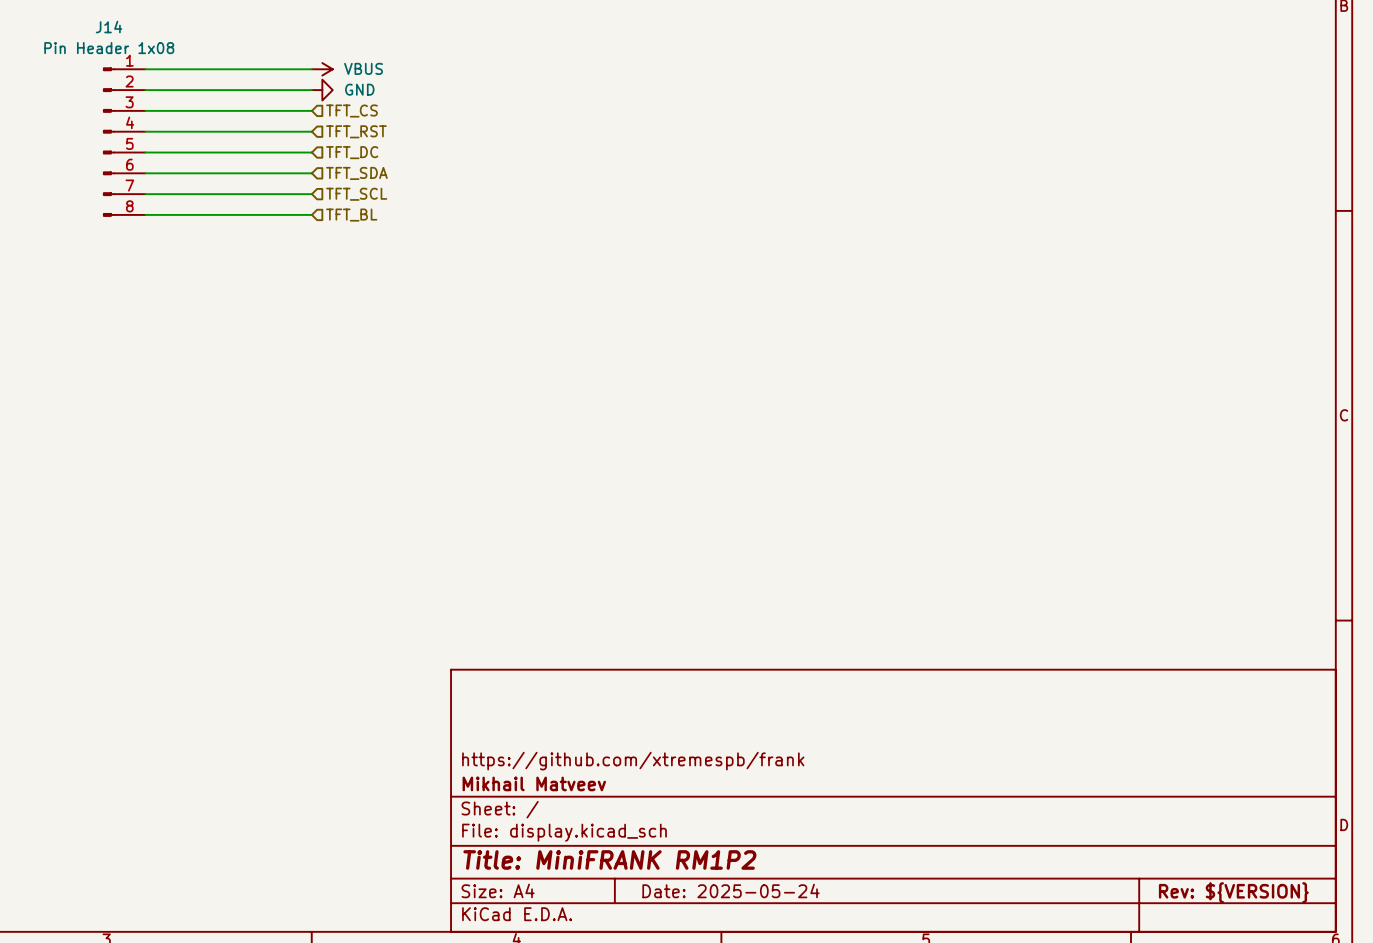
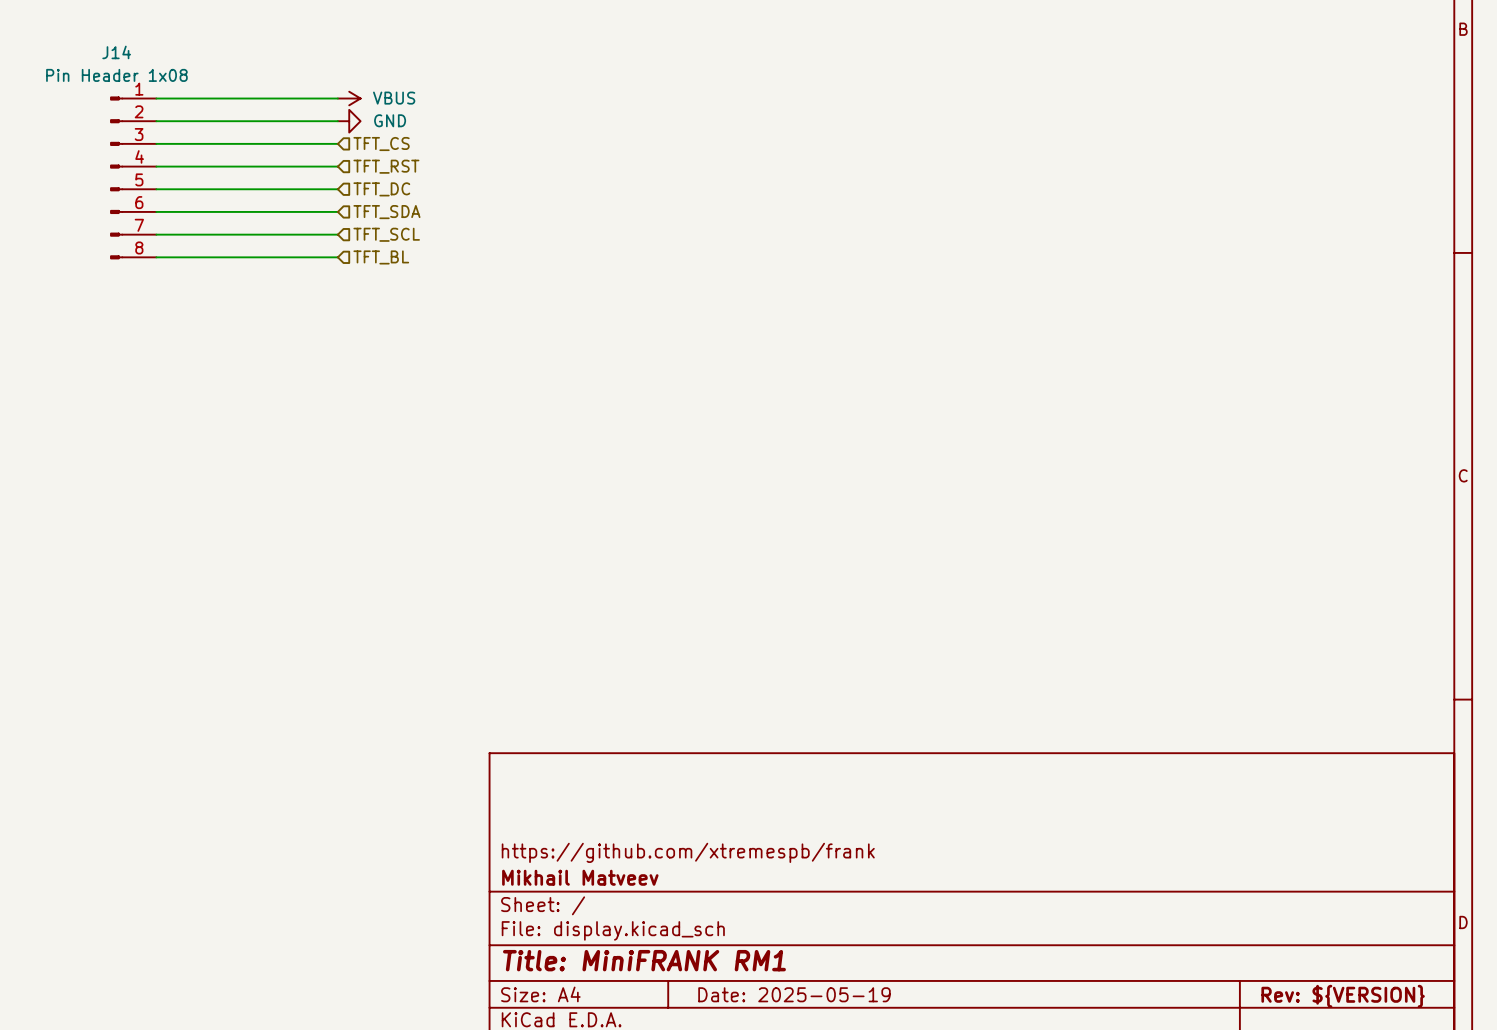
title block: Title: MiniFRANK RM1P2 (609, 859) -> Title: MiniFRANK RM1 (644, 960)
title block: Date: 2025-05-24 (730, 890) -> Date: 2025-05-19 (794, 994)

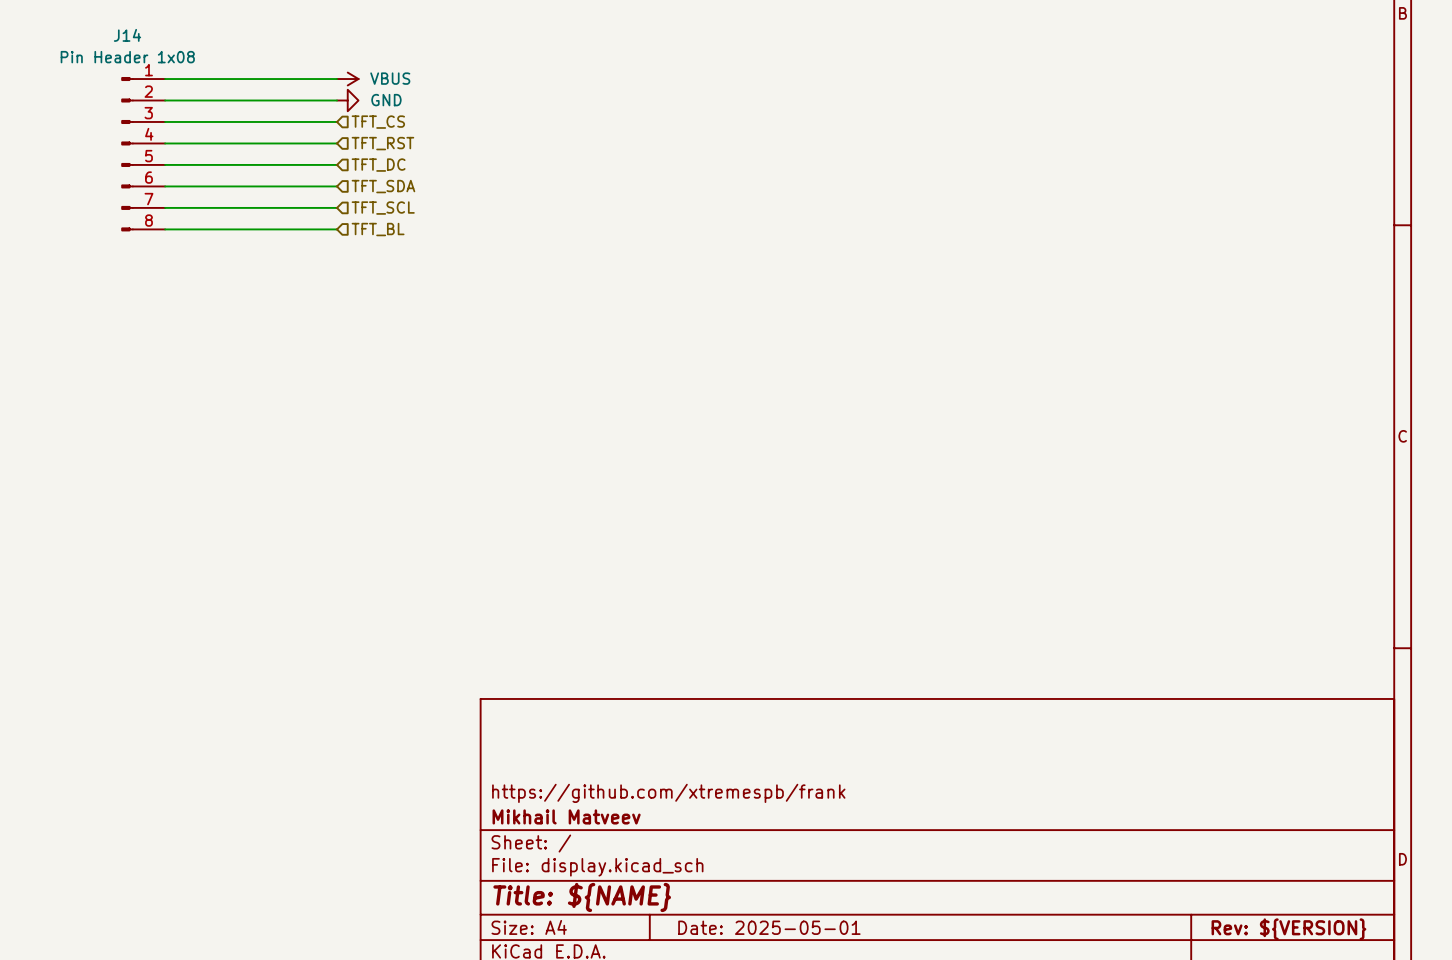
title block: Title: MiniFRANK RM1 (644, 960) -> Title: ${NAME} (582, 897)
title block: Date: 2025-05-19 (794, 994) -> Date: 2025-05-01 (769, 927)

